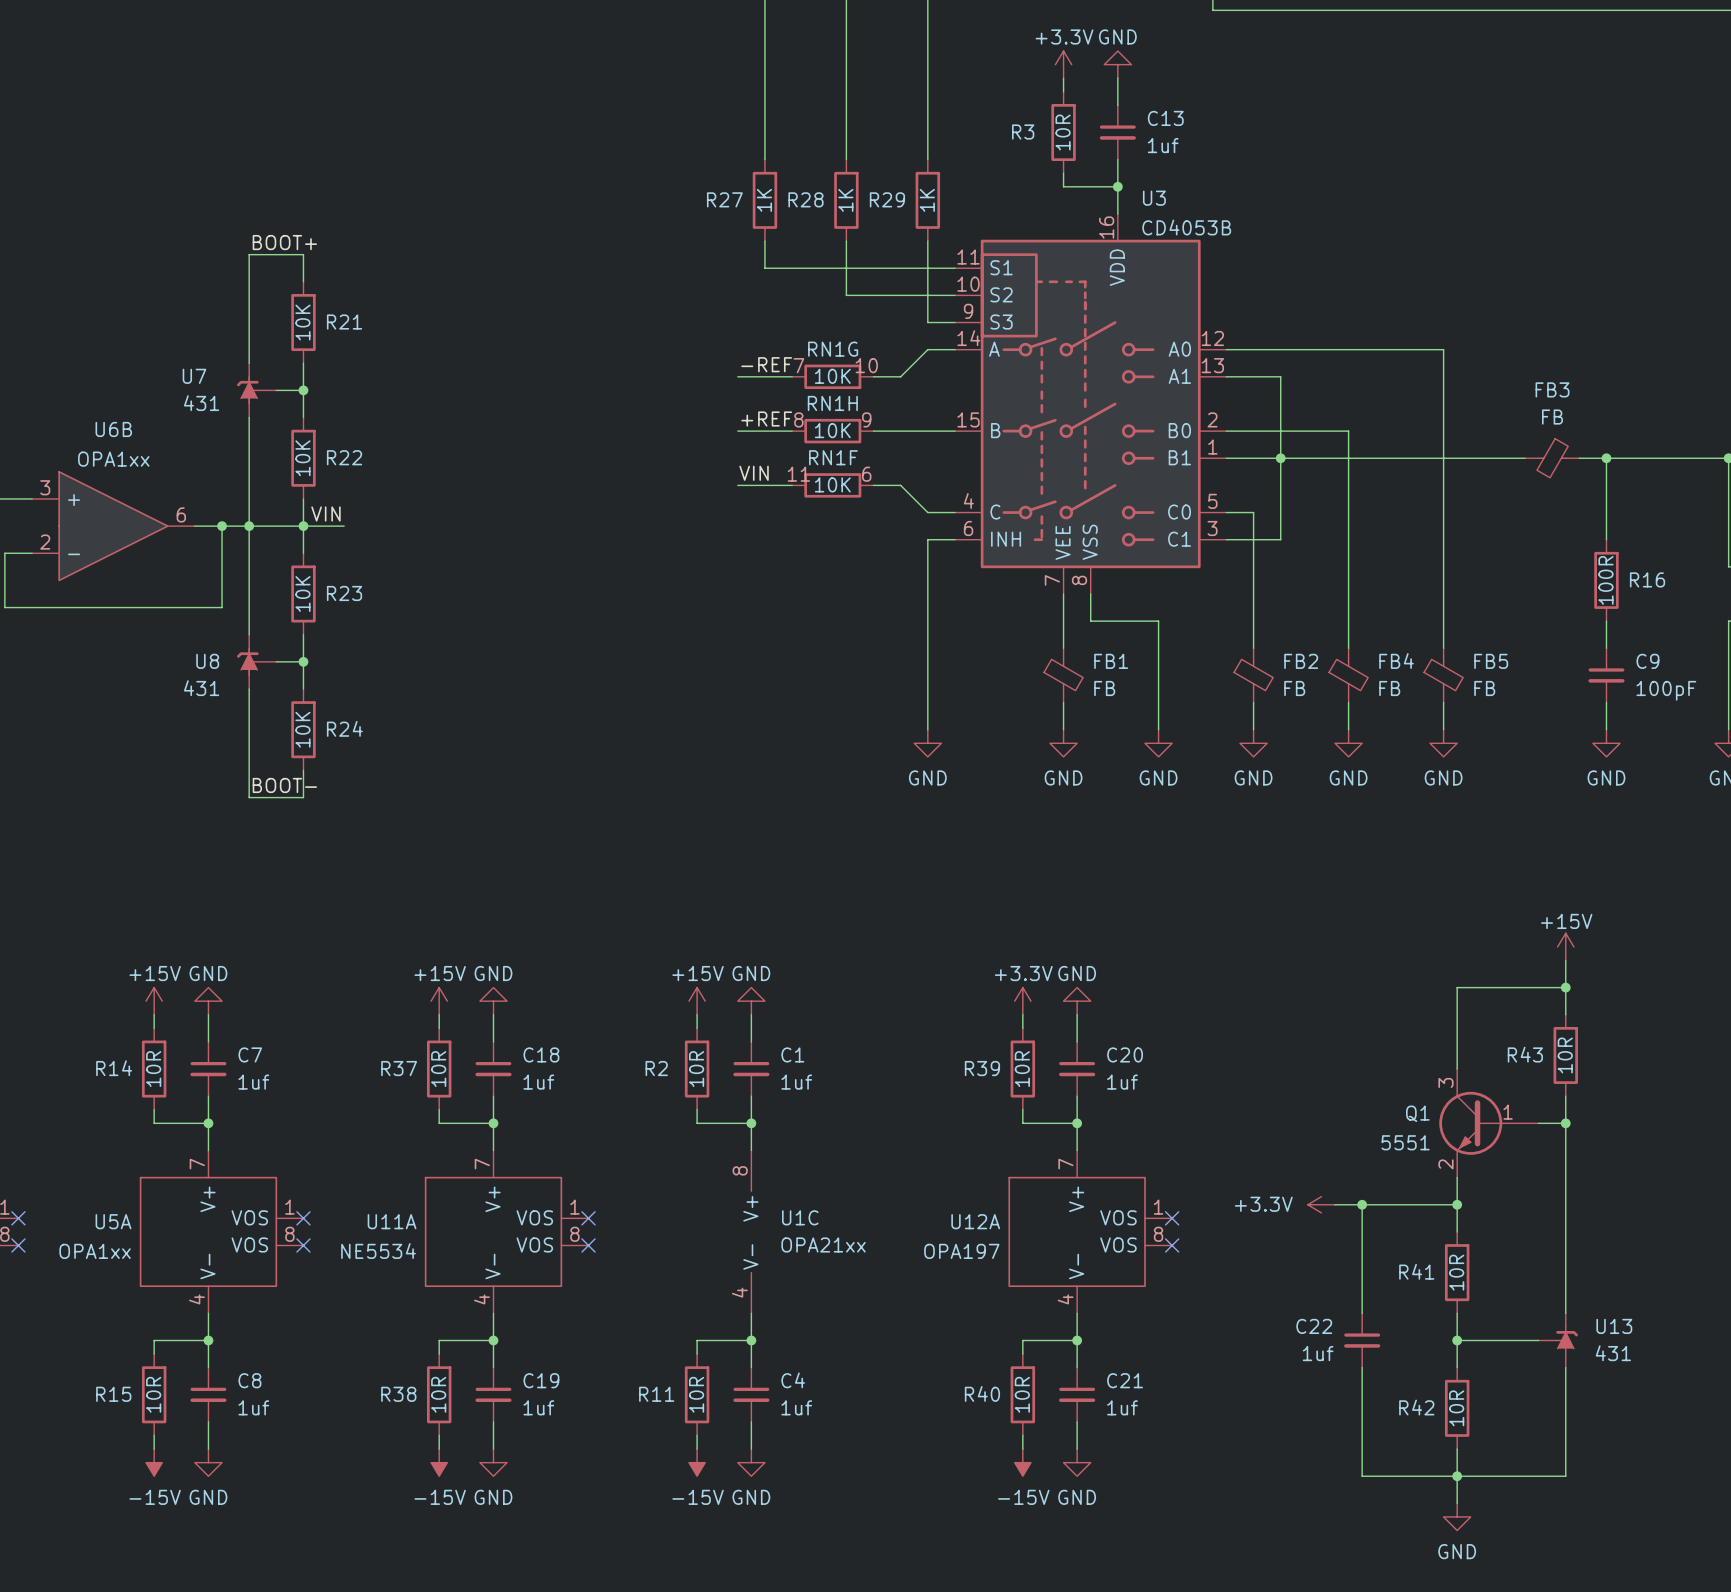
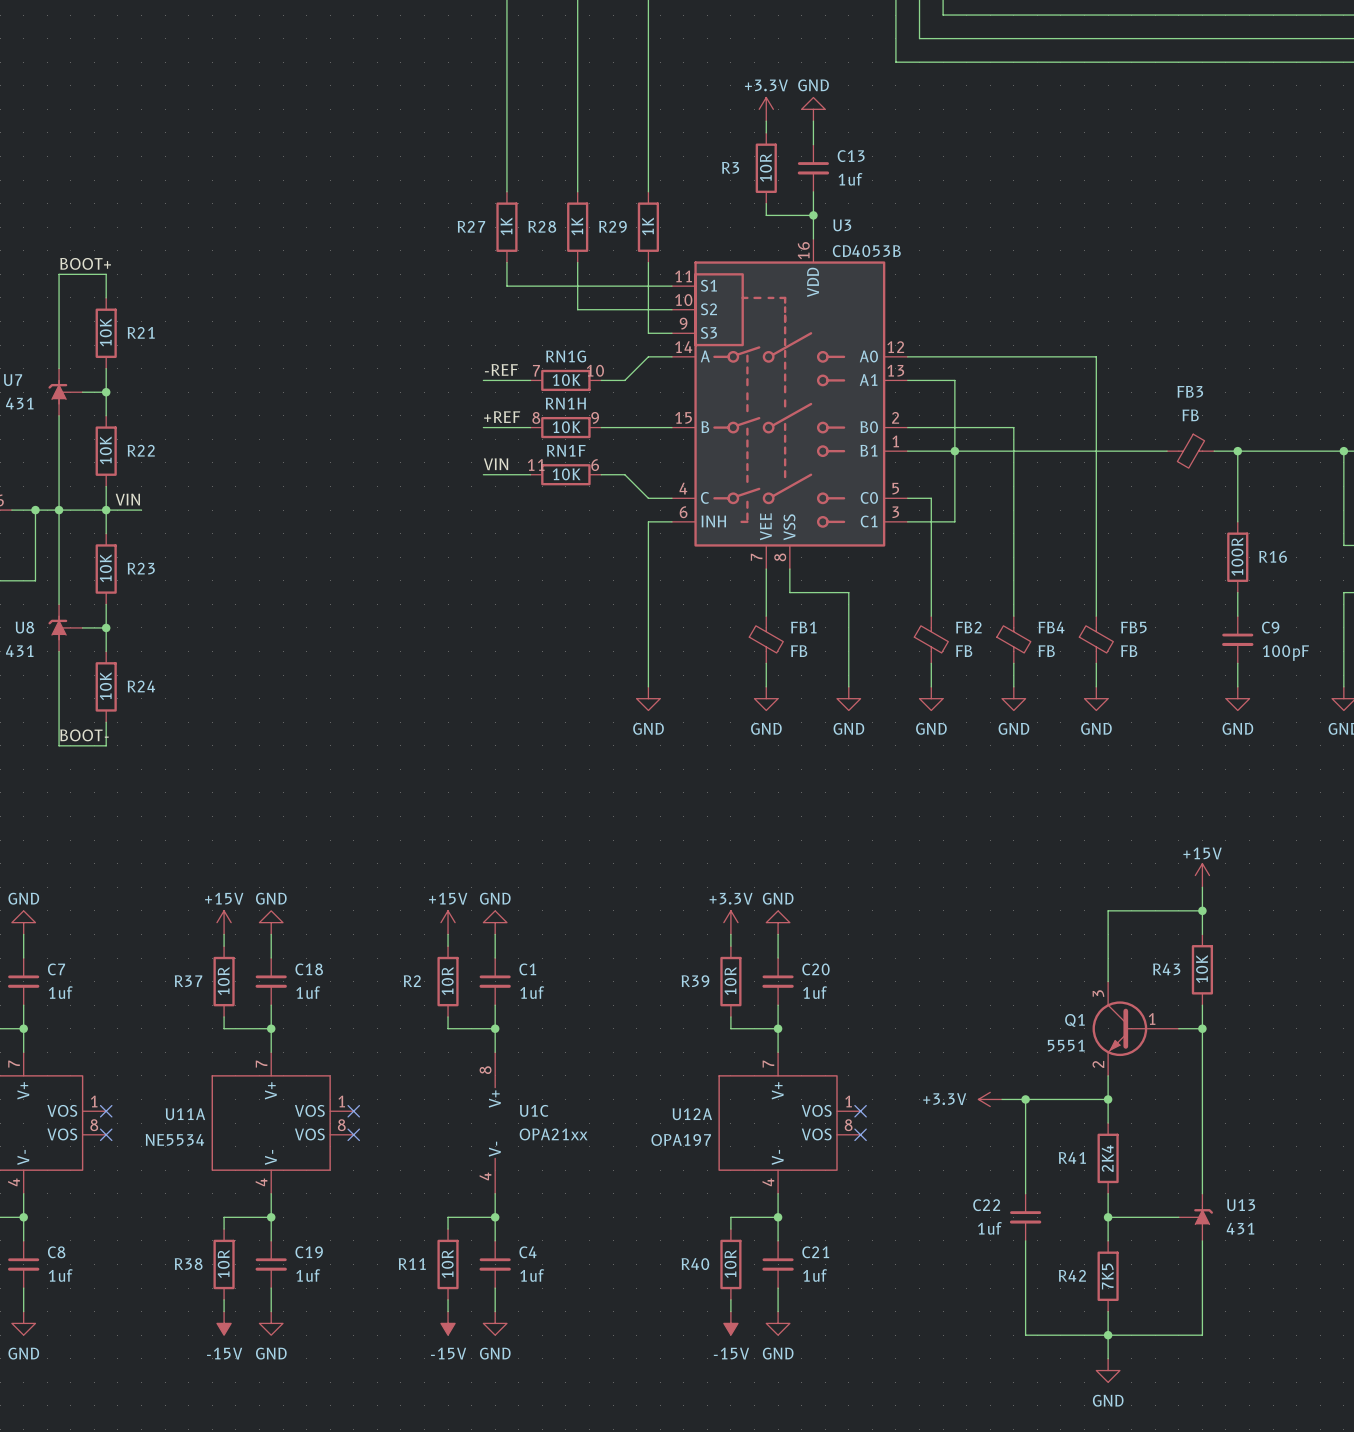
R43 value: 10R (1565, 1055) -> 10K (1202, 969)
R41 value: 10R (1456, 1272) -> 2K4 (1107, 1158)
R42 value: 10R (1456, 1408) -> 7K5 (1107, 1276)

